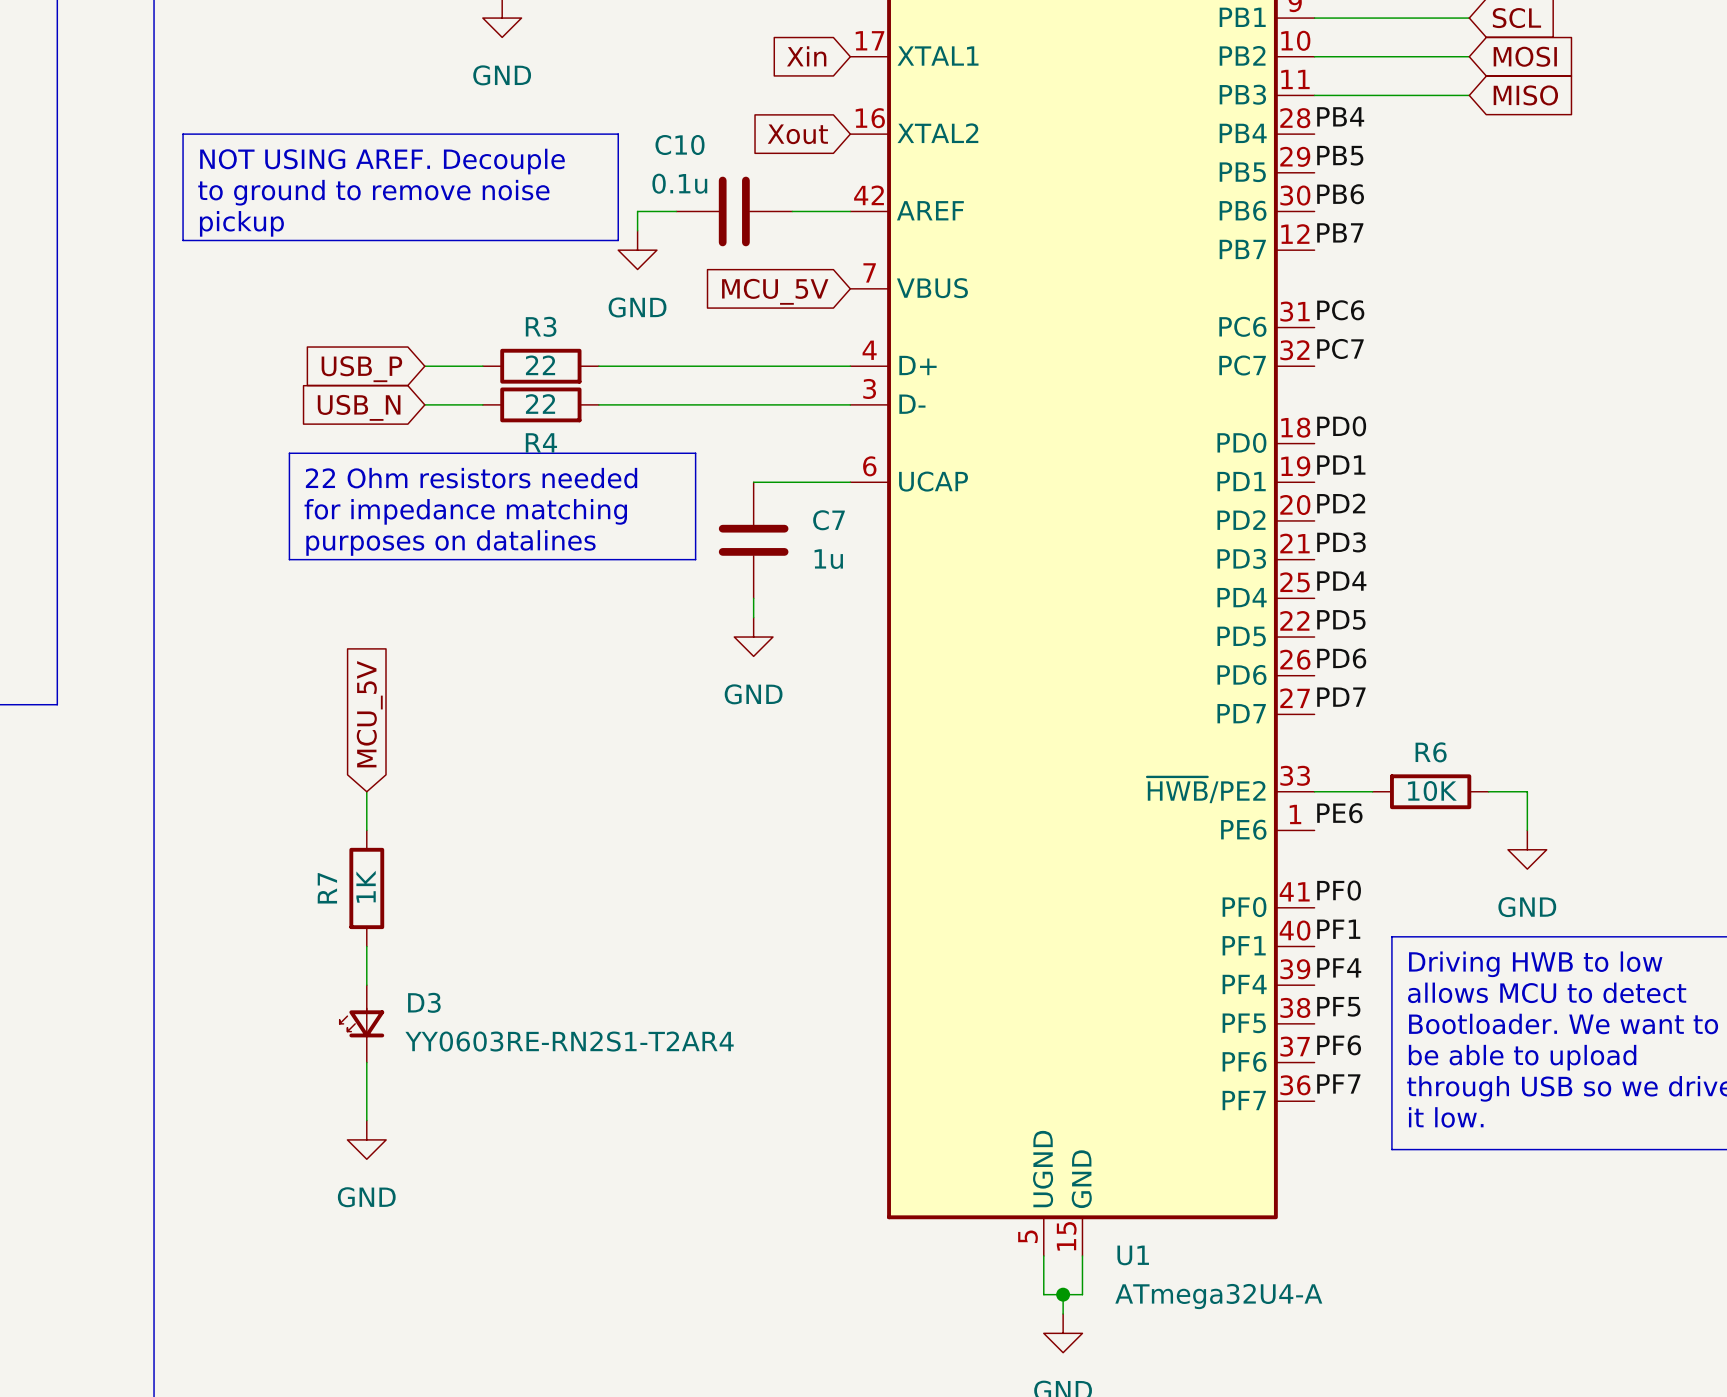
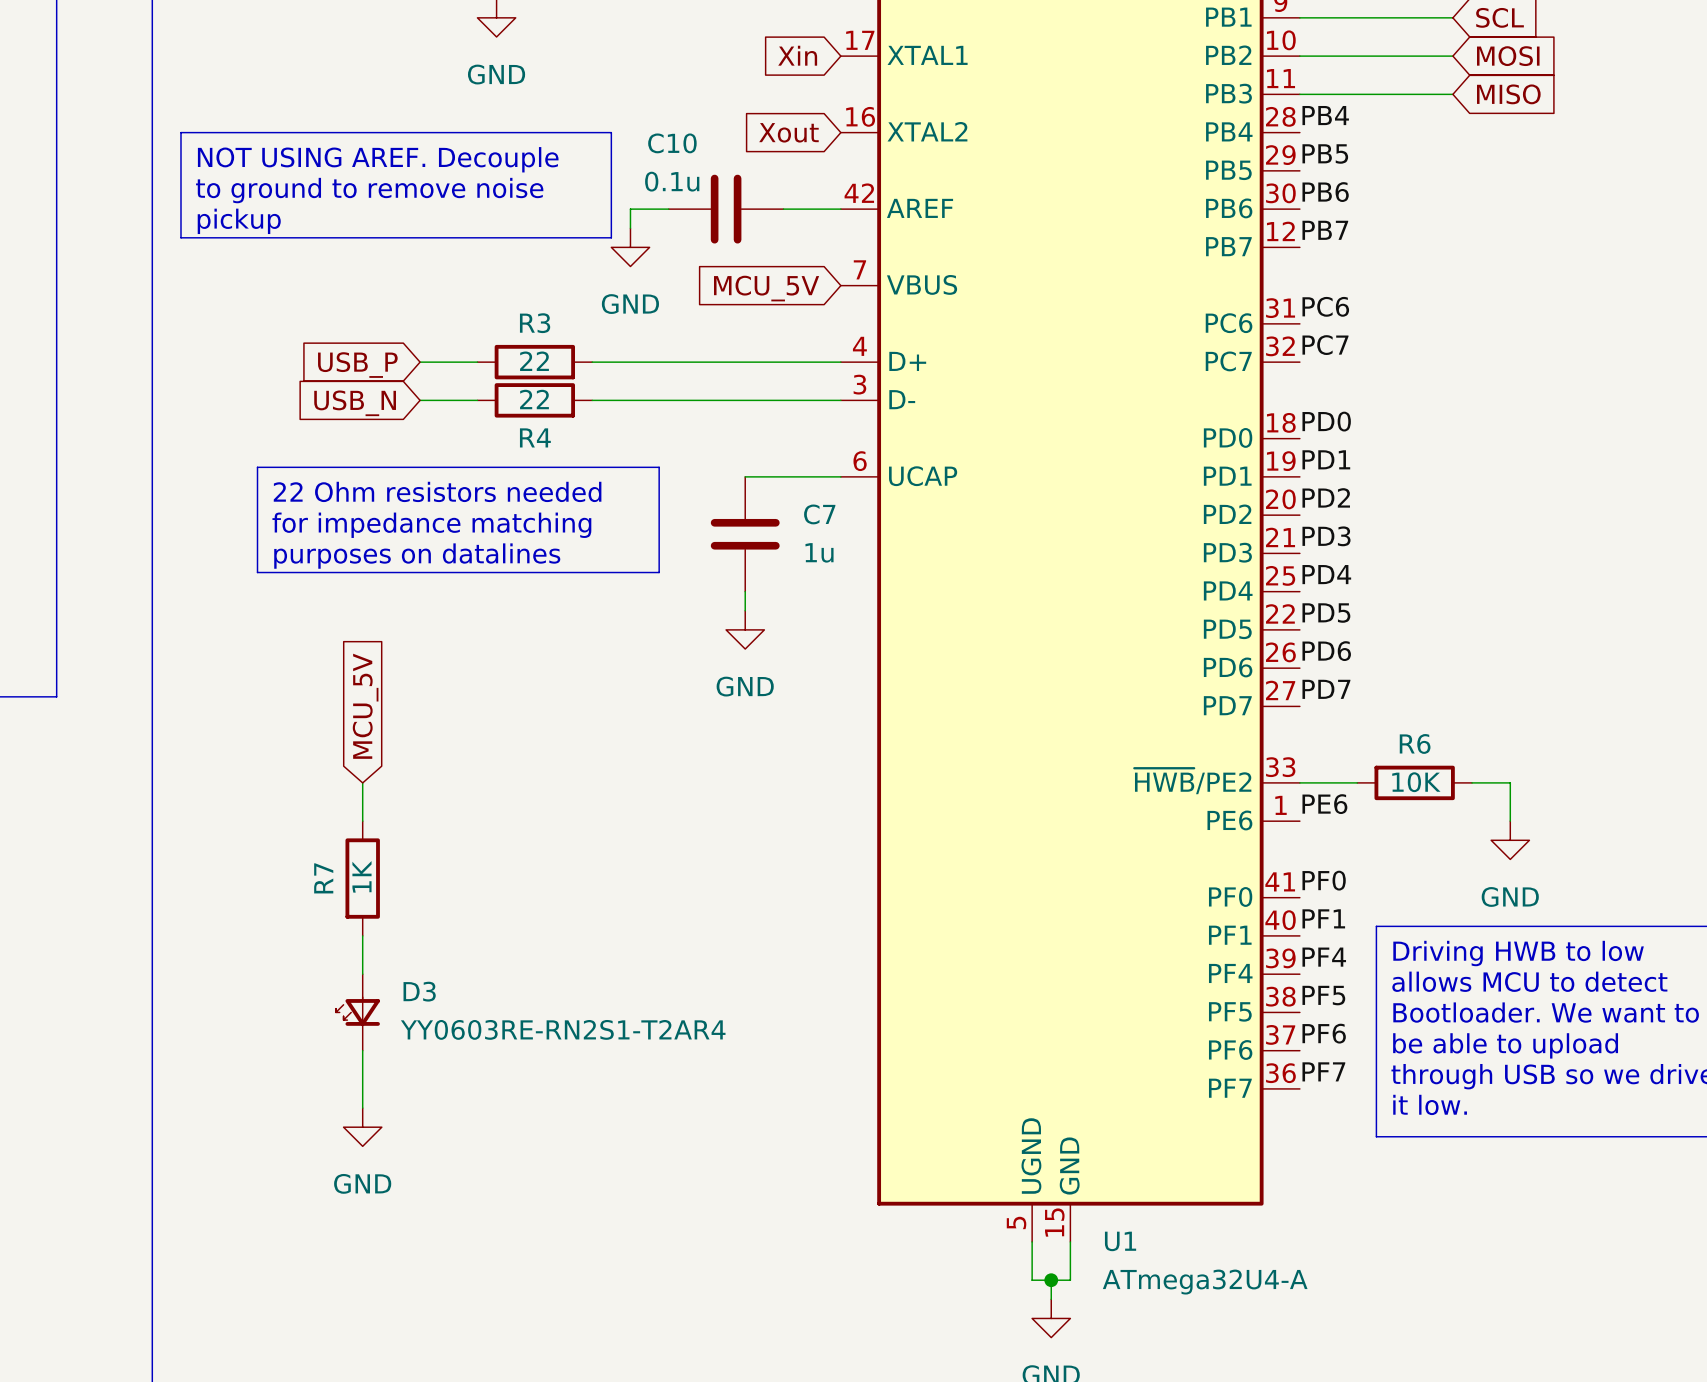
line: (289, 453) (695, 453) (695, 559) (289, 559) (289, 453) -> (257, 467) (257, 572) (659, 572) (659, 467) (257, 467)
text position: 22 Ohm resistors needed (471, 478) -> 22 Ohm resistors needed (437, 491)
text position: for impedance matching (465, 511) -> for impedance matching (431, 525)
text position: purposes on datalines (450, 542) -> purposes on datalines (417, 556)

